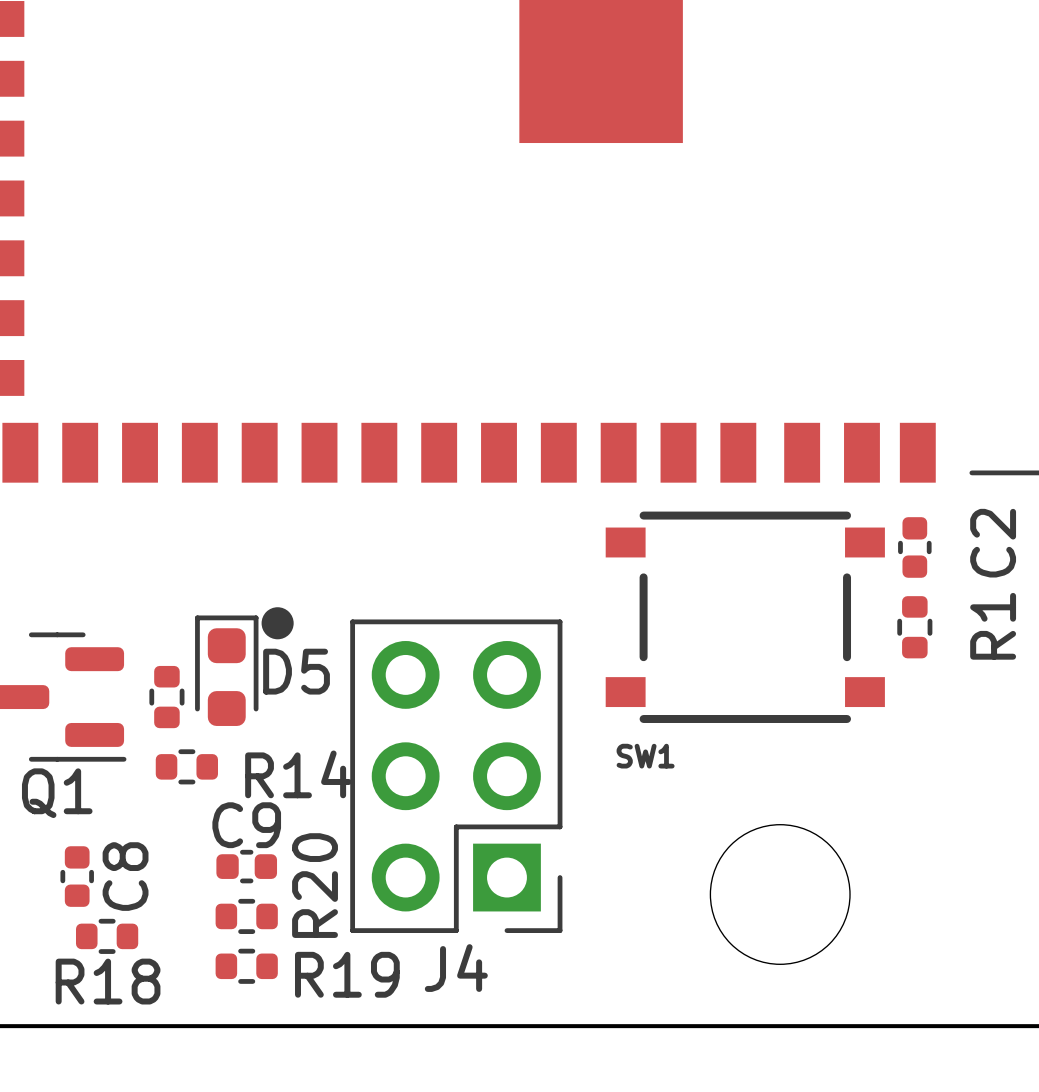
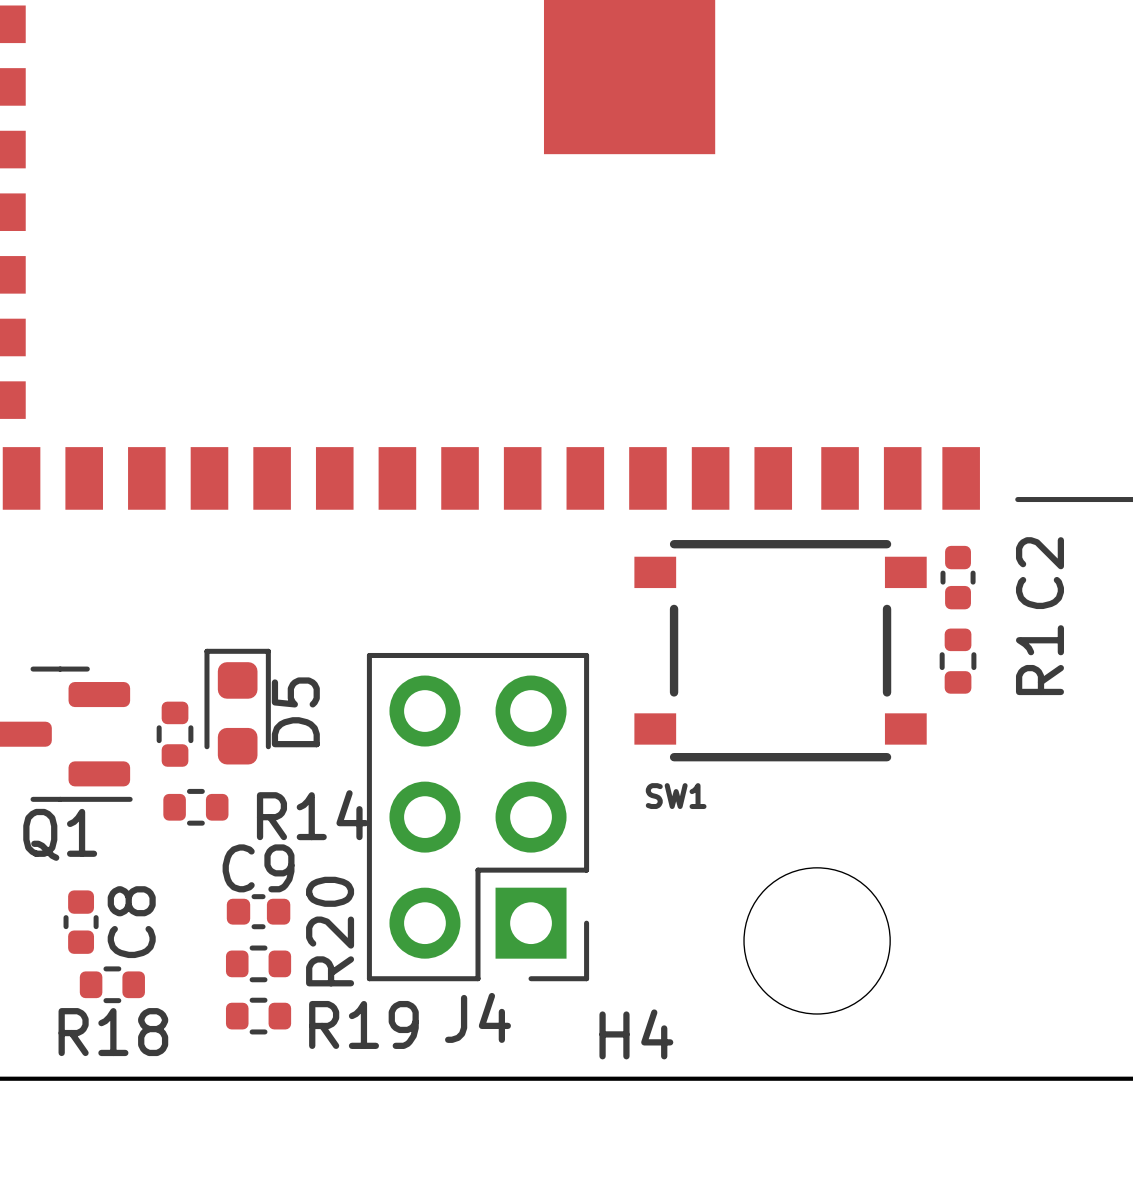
drawing: [261, 607, 294, 640] -> none
D5 name rotation: 0° (296, 671) -> 90° counterclockwise (295, 712)
H4 name: none -> H4 (636, 1034)

